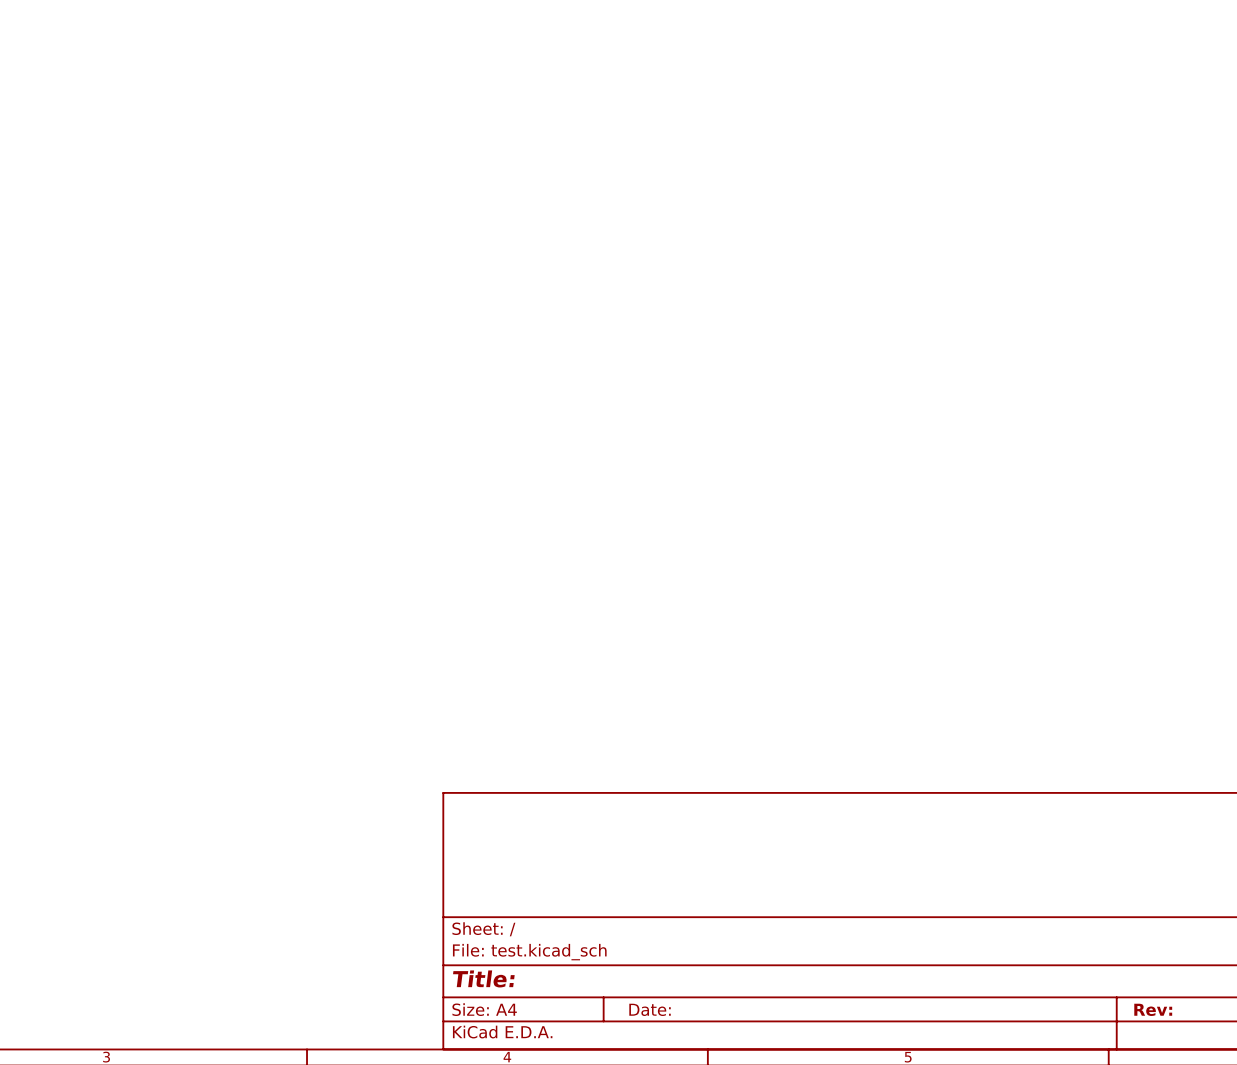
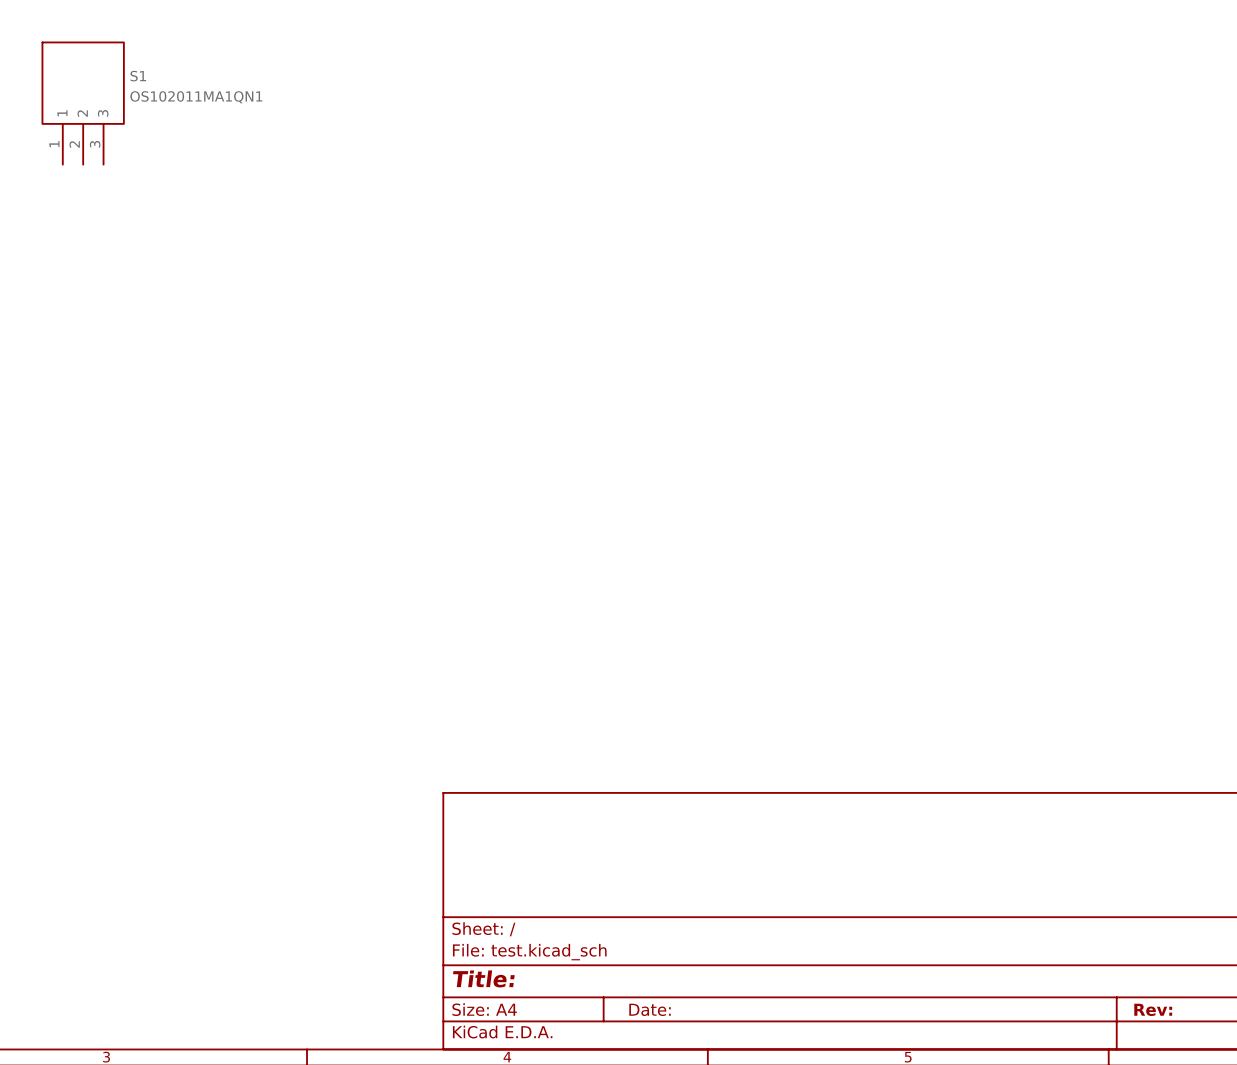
S1: none -> OS102011MA1QN1 (83, 103)

